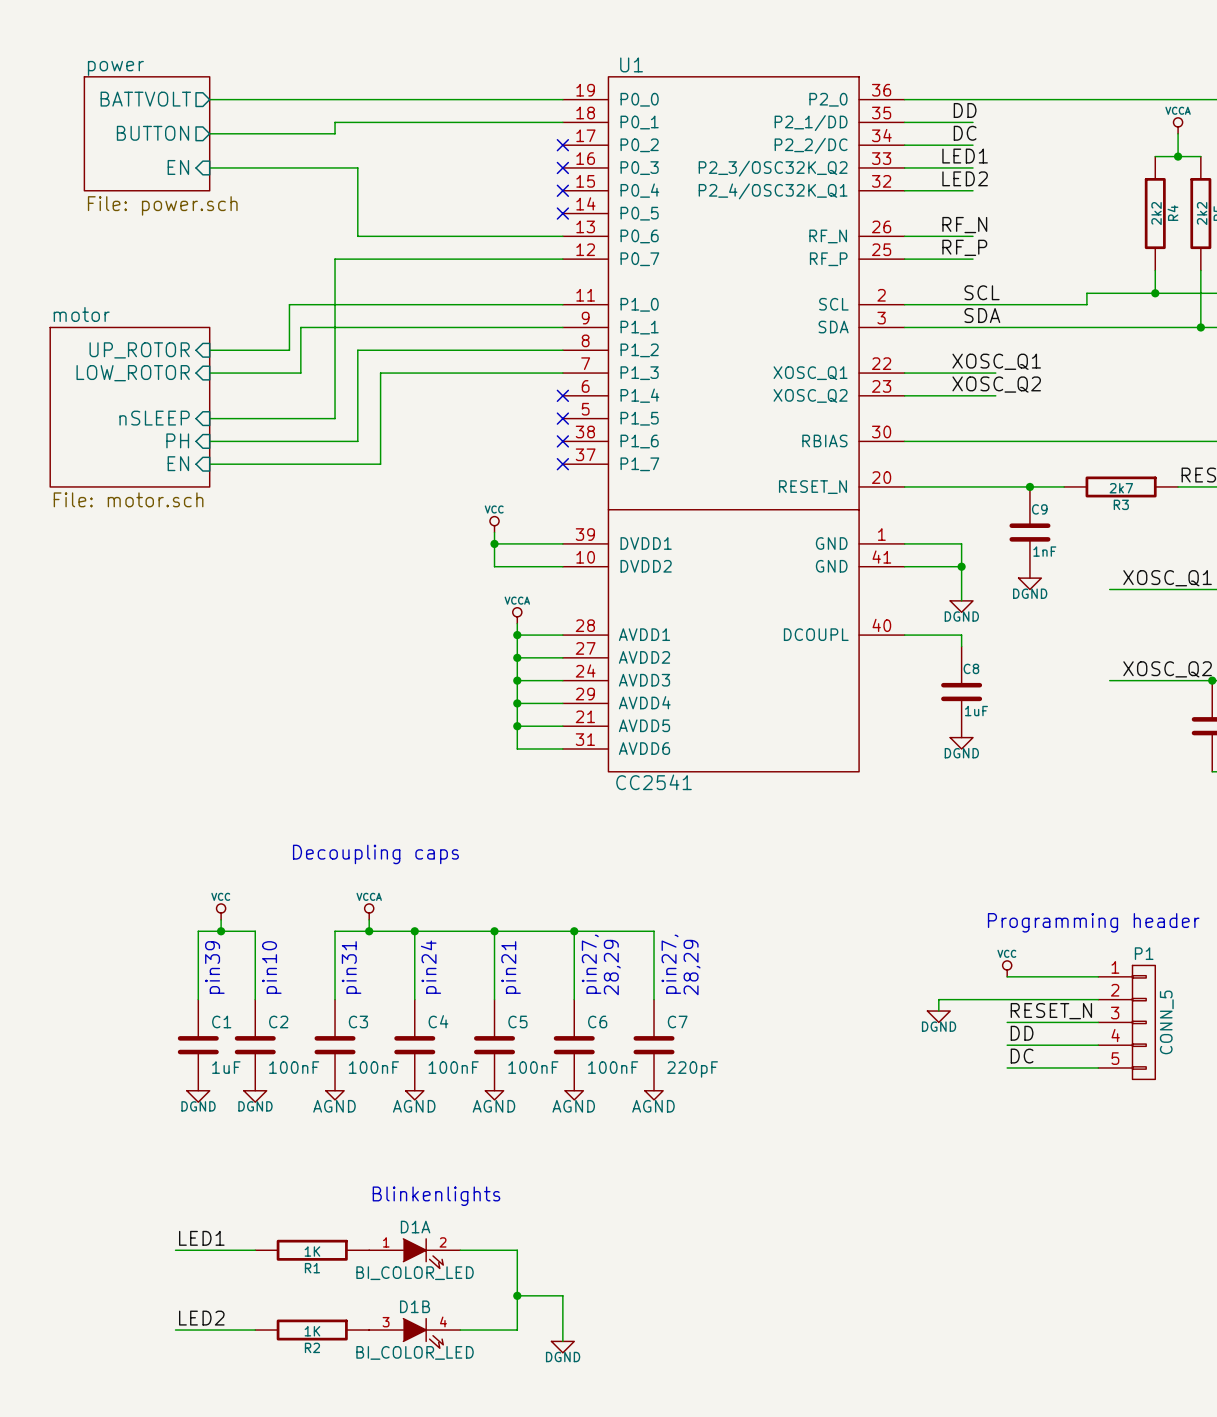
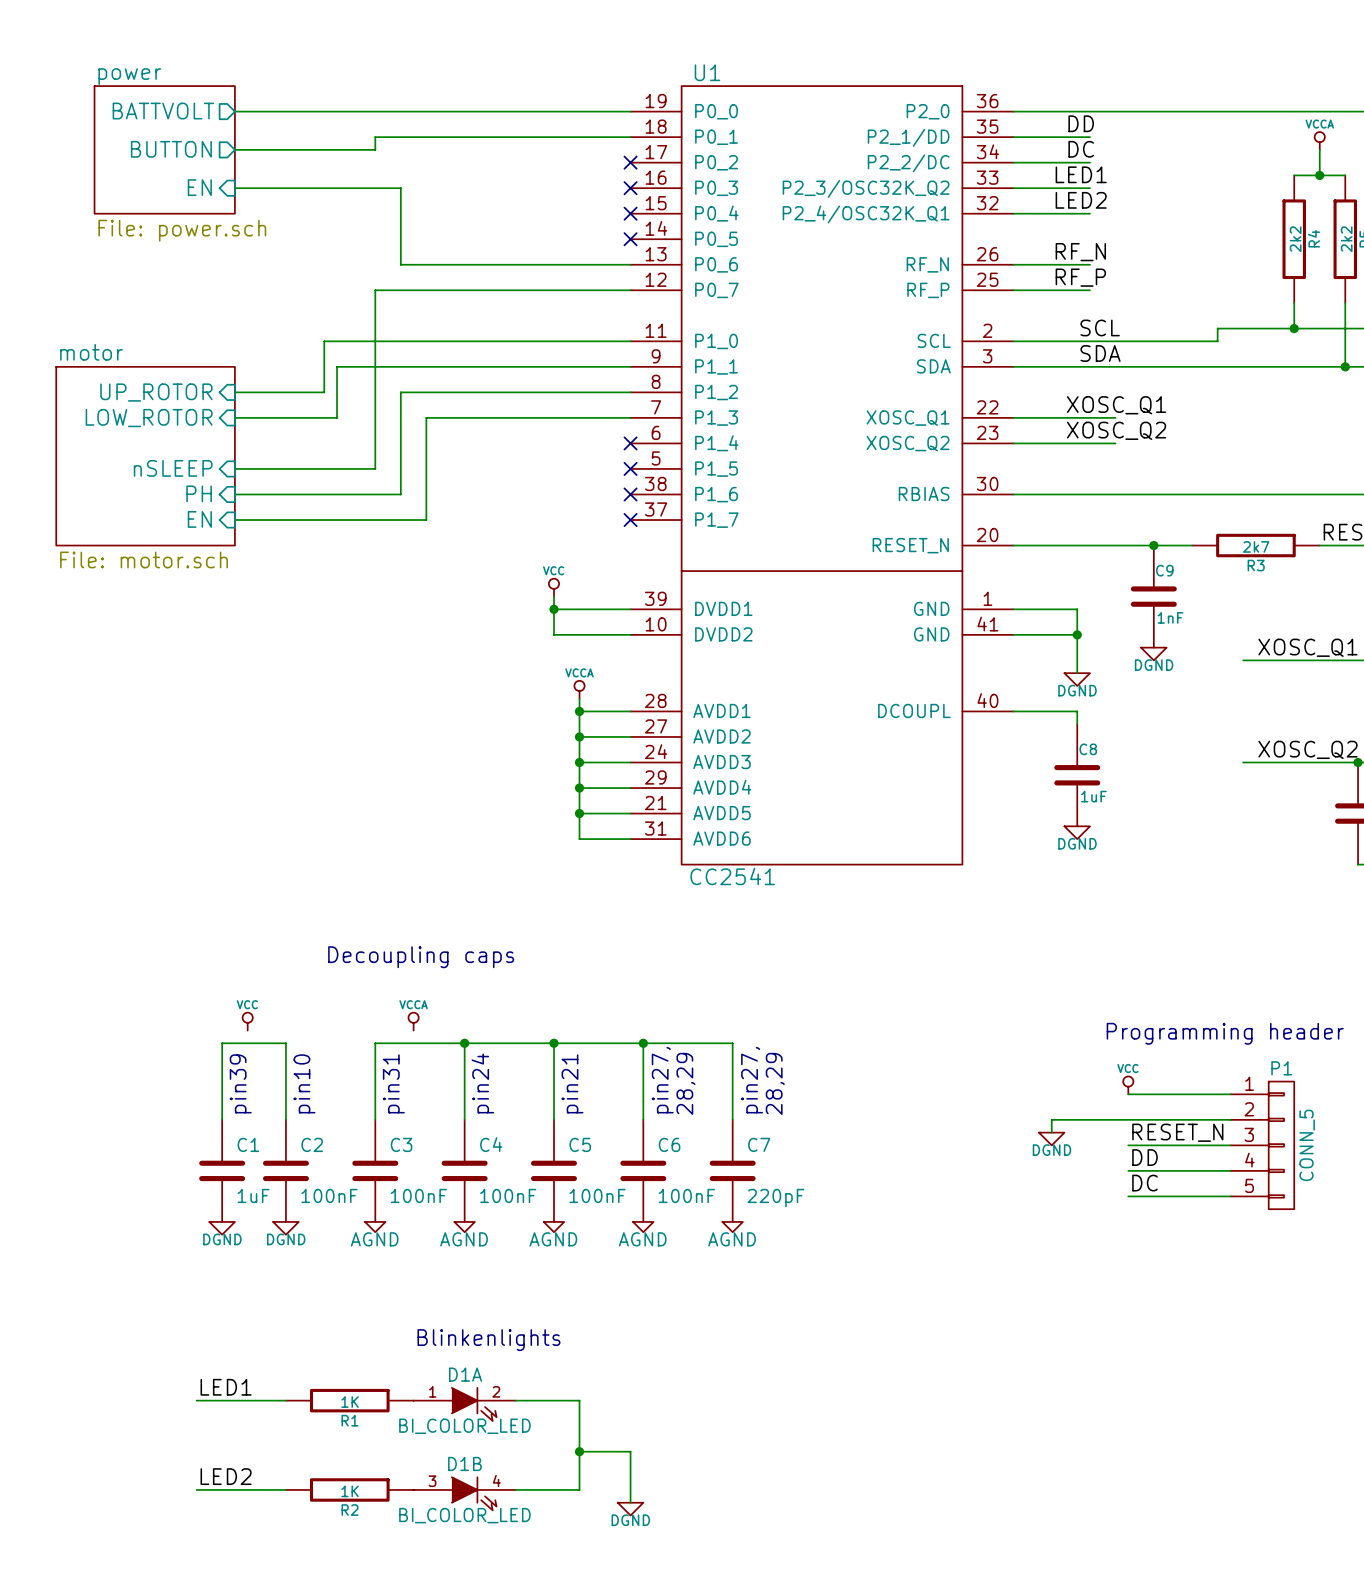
wire: (221, 919) (221, 931) -> none
wire: (369, 919) (369, 931) -> none
junction: (221, 931) -> none
junction: (369, 931) -> none

